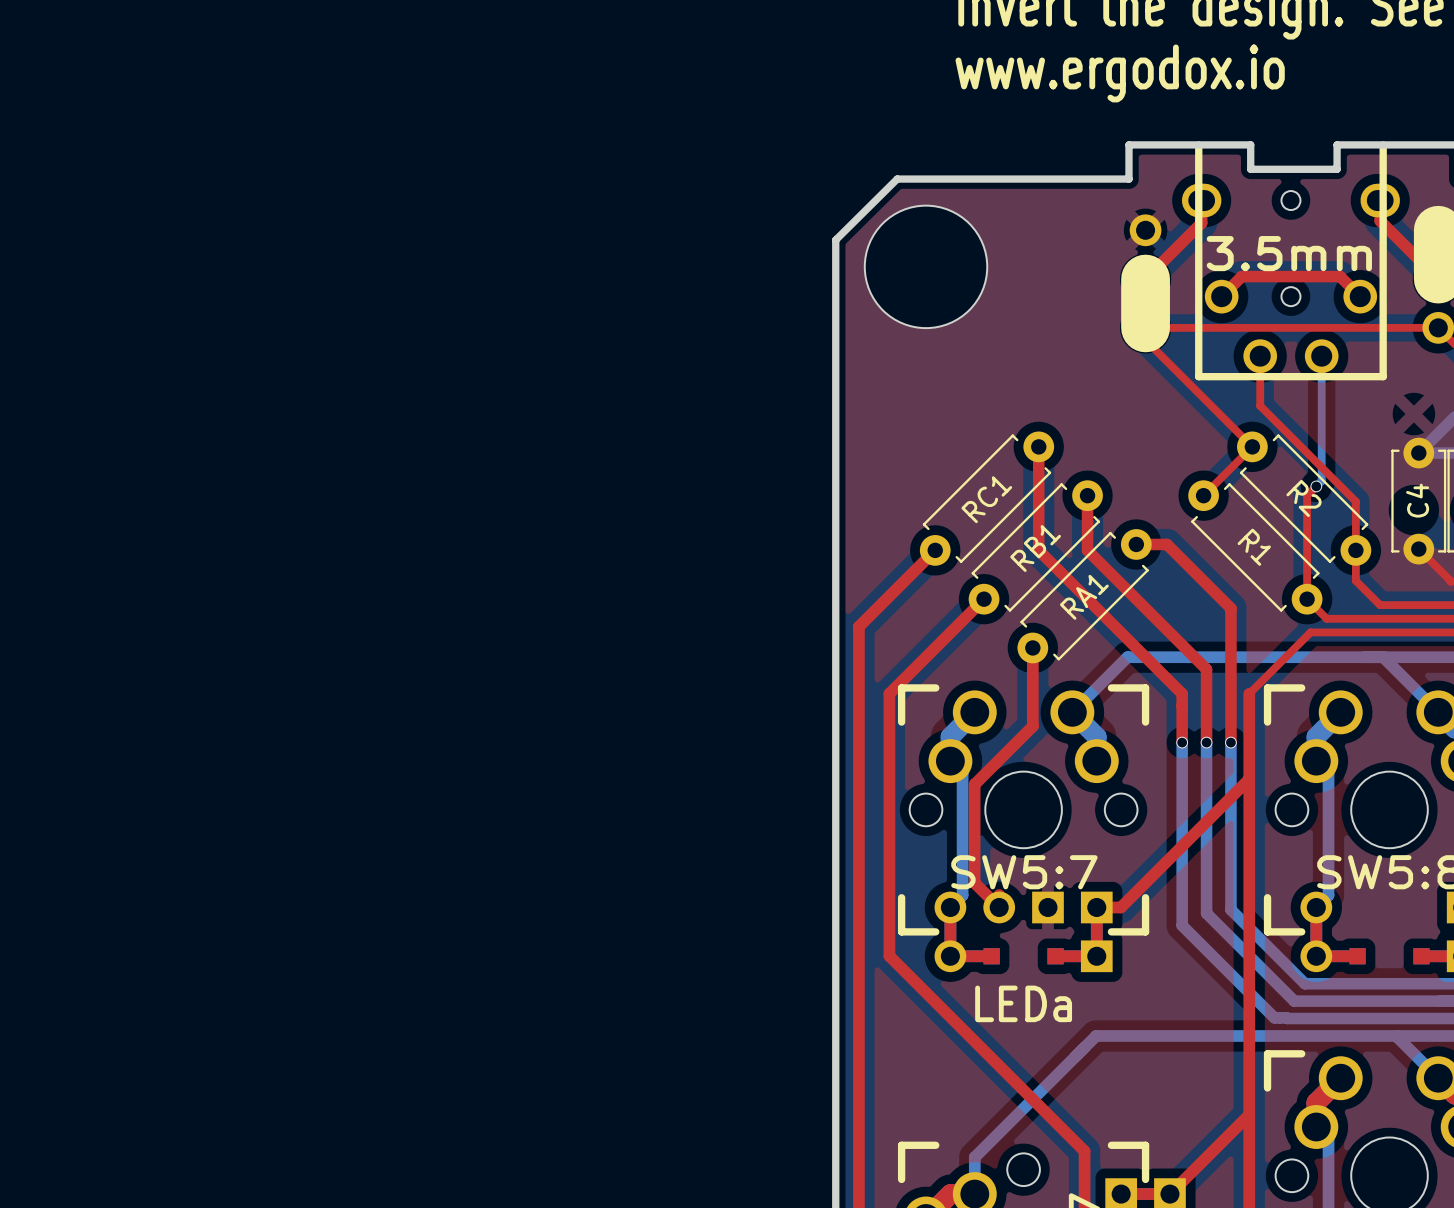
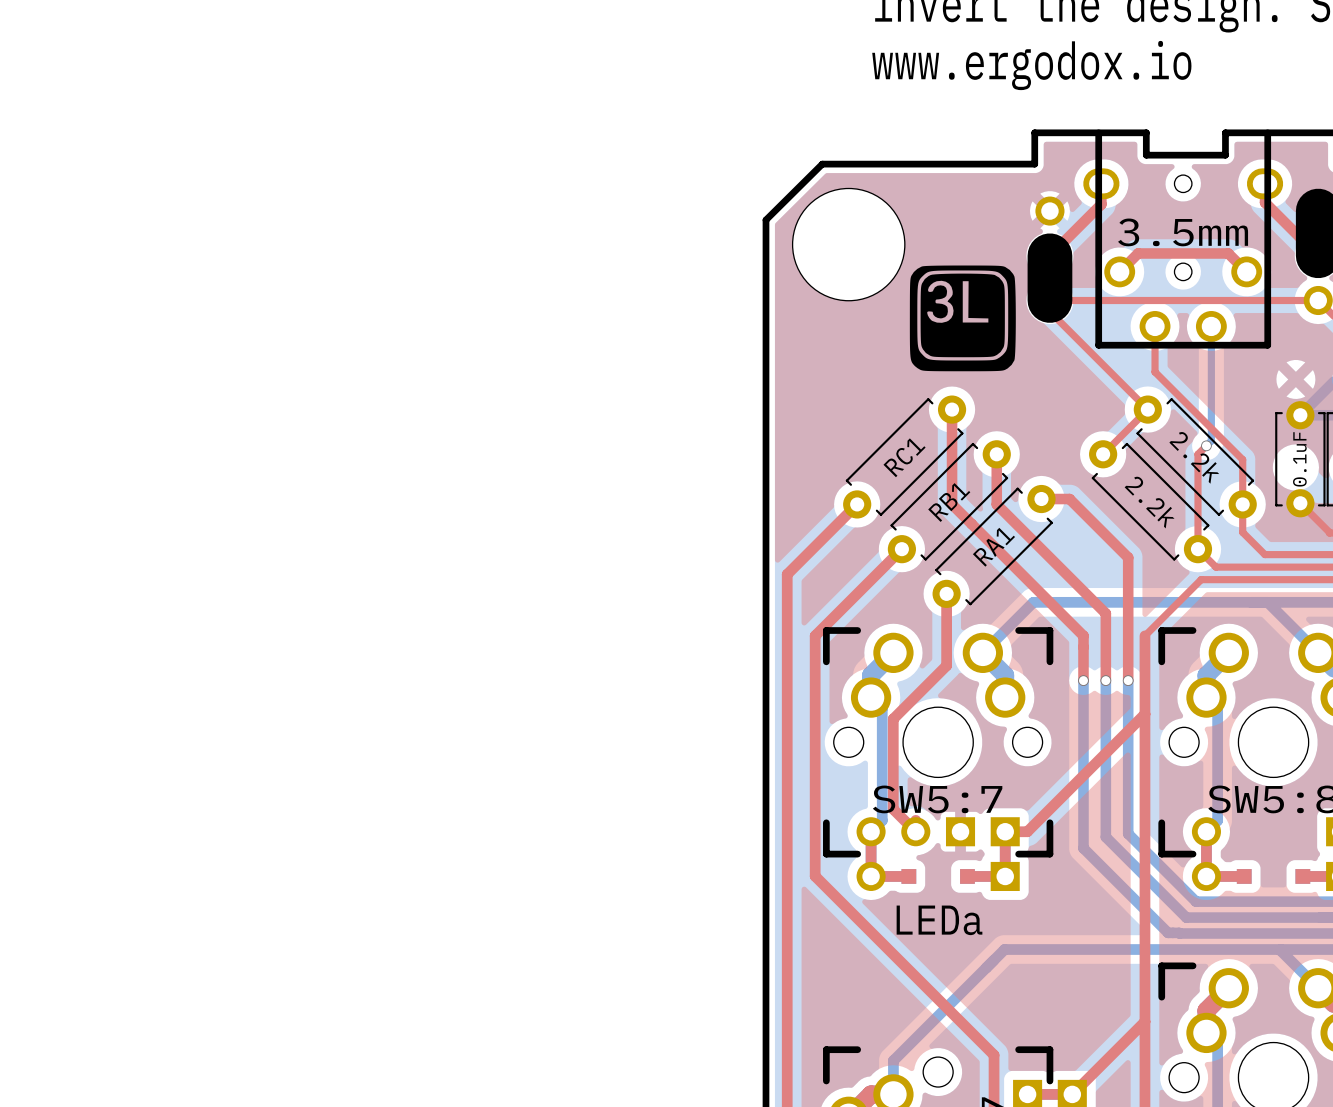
drawing: none -> [909, 265, 1016, 372]
text: none -> 2.2k (1194, 457)
R2 name: R2 (1304, 498) -> none
C4 name: C4 (1417, 500) -> none
text: none -> 0.1uF (1299, 459)
text: none -> 2.2k (1149, 502)
R1 name: R1 (1254, 547) -> none

